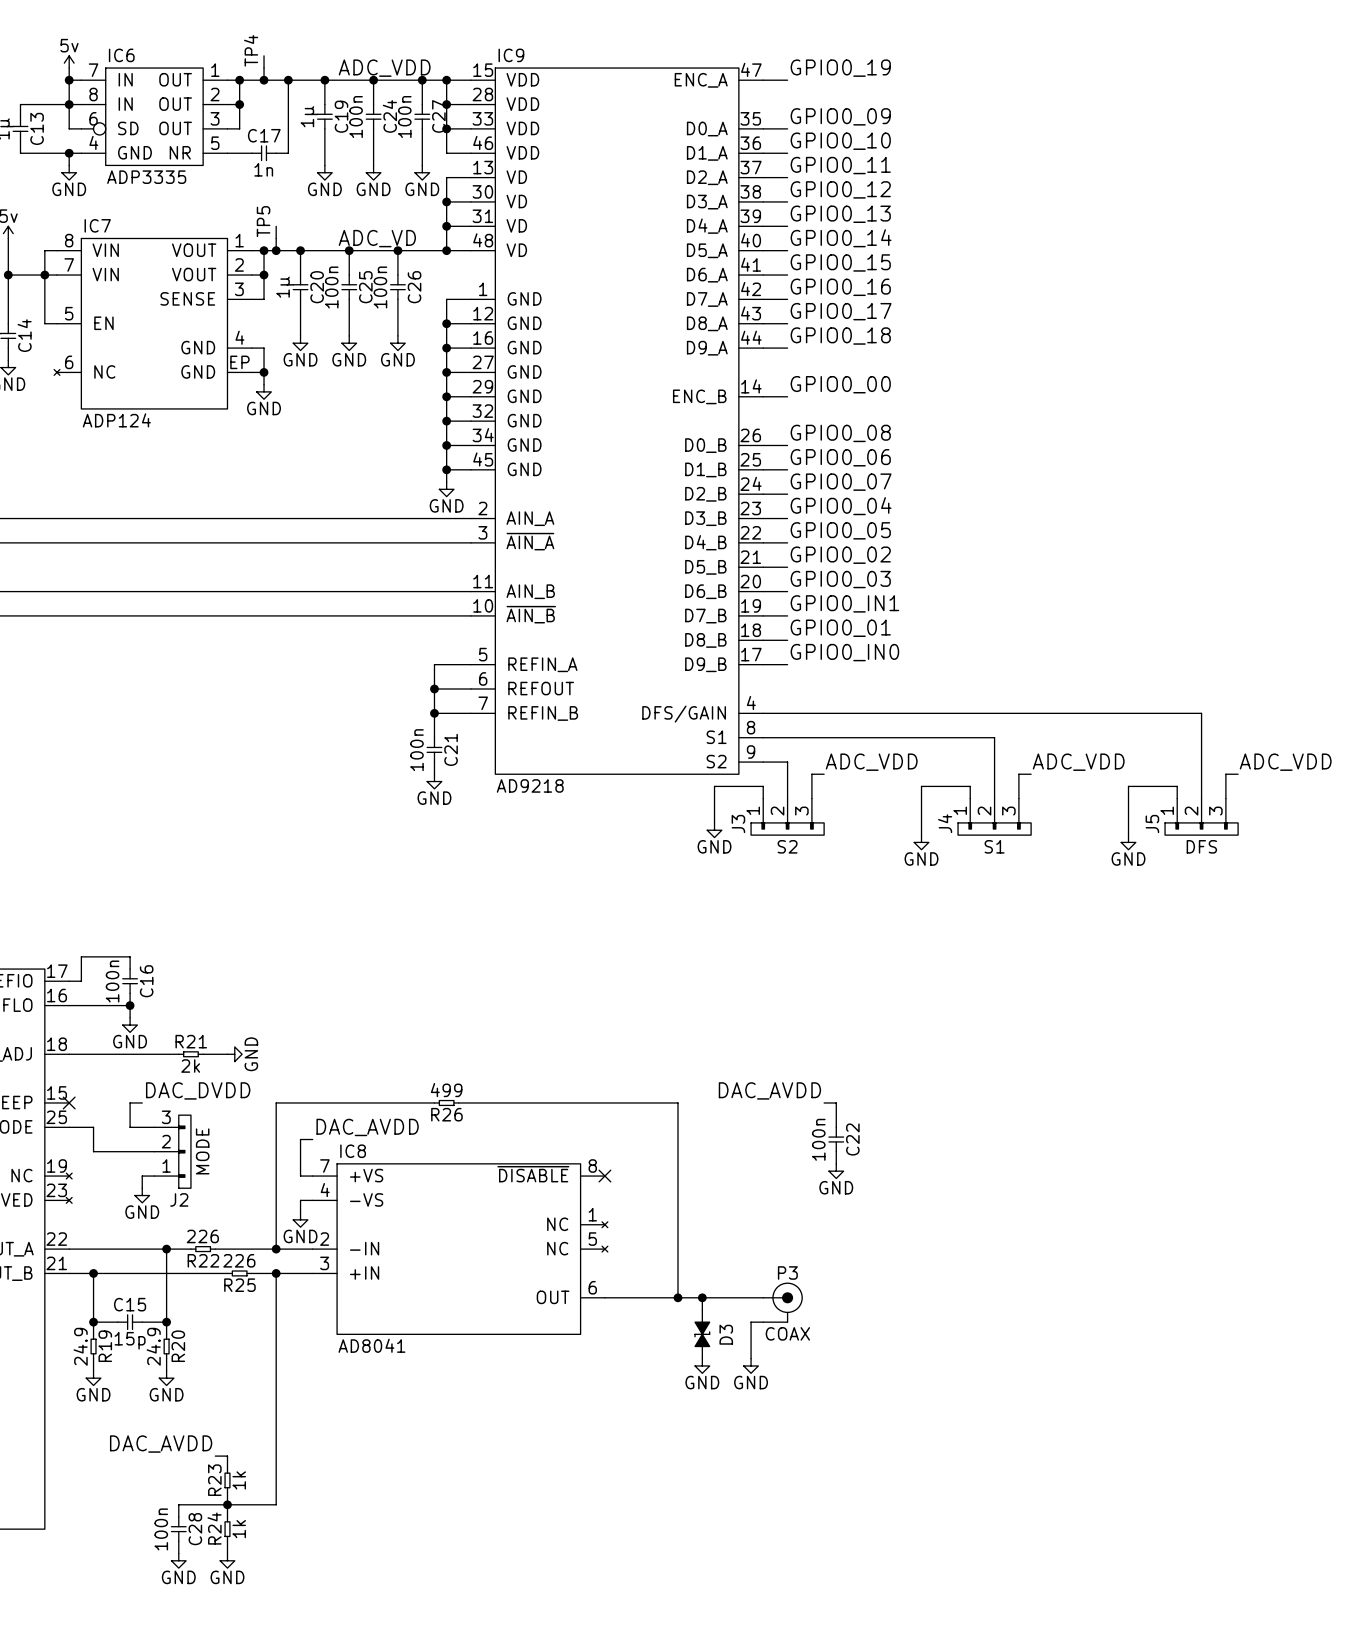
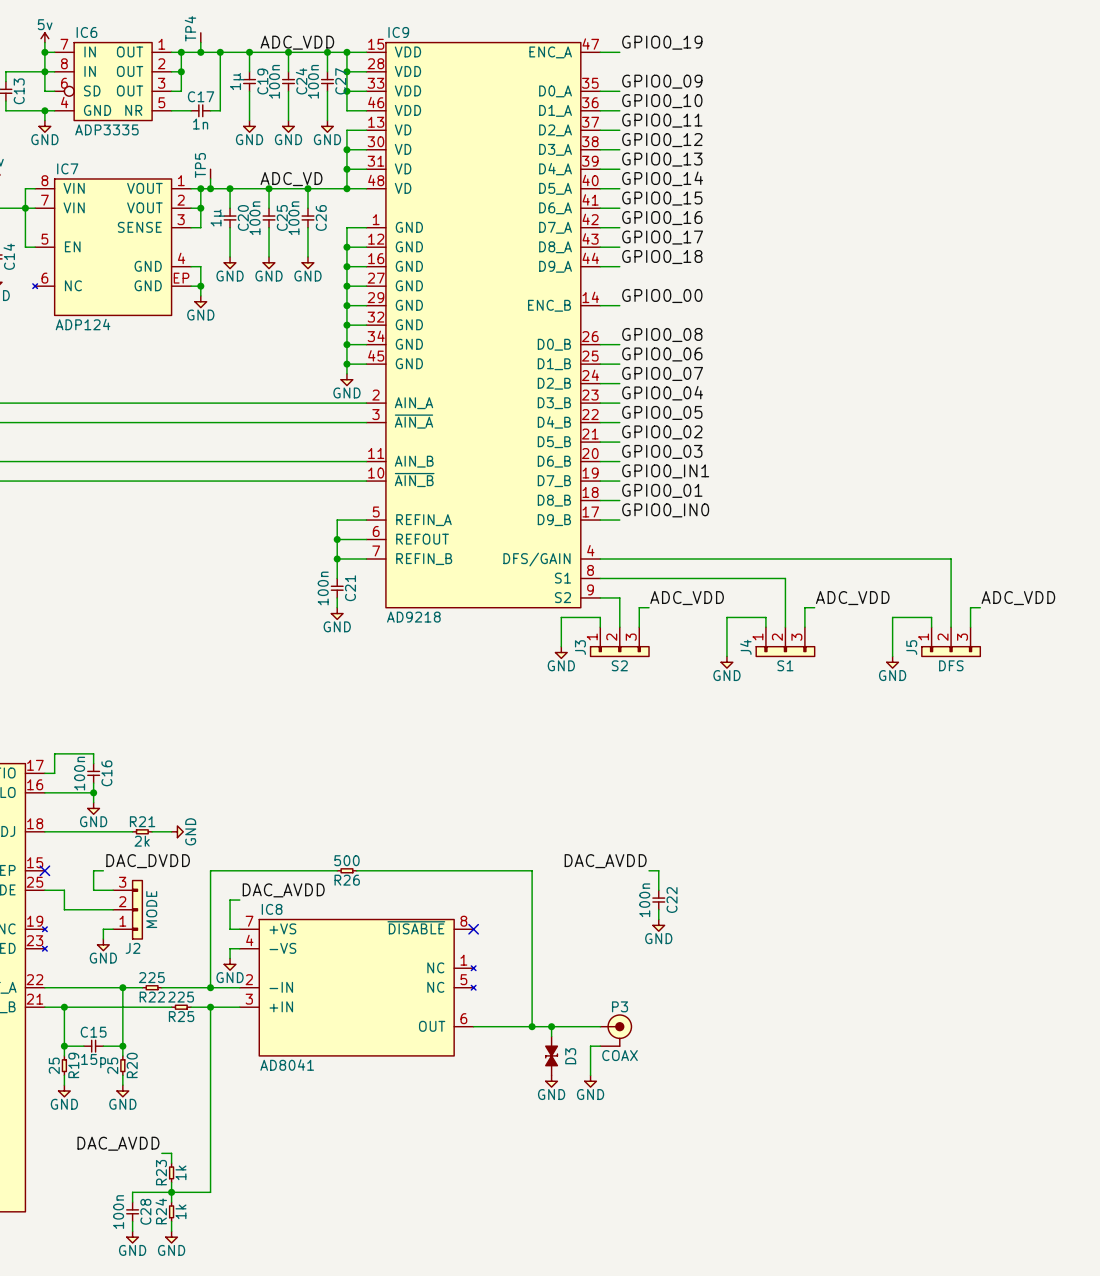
R26 value: 499 (446, 1090) -> 500 (346, 860)
R22 value: 226 (202, 1236) -> 225 (151, 977)
R25 value: 226 (239, 1260) -> 225 (181, 997)
R19 value: 24.9 (80, 1346) -> 25 (54, 1065)
R20 value: 24.9 (153, 1346) -> 25 (112, 1065)

